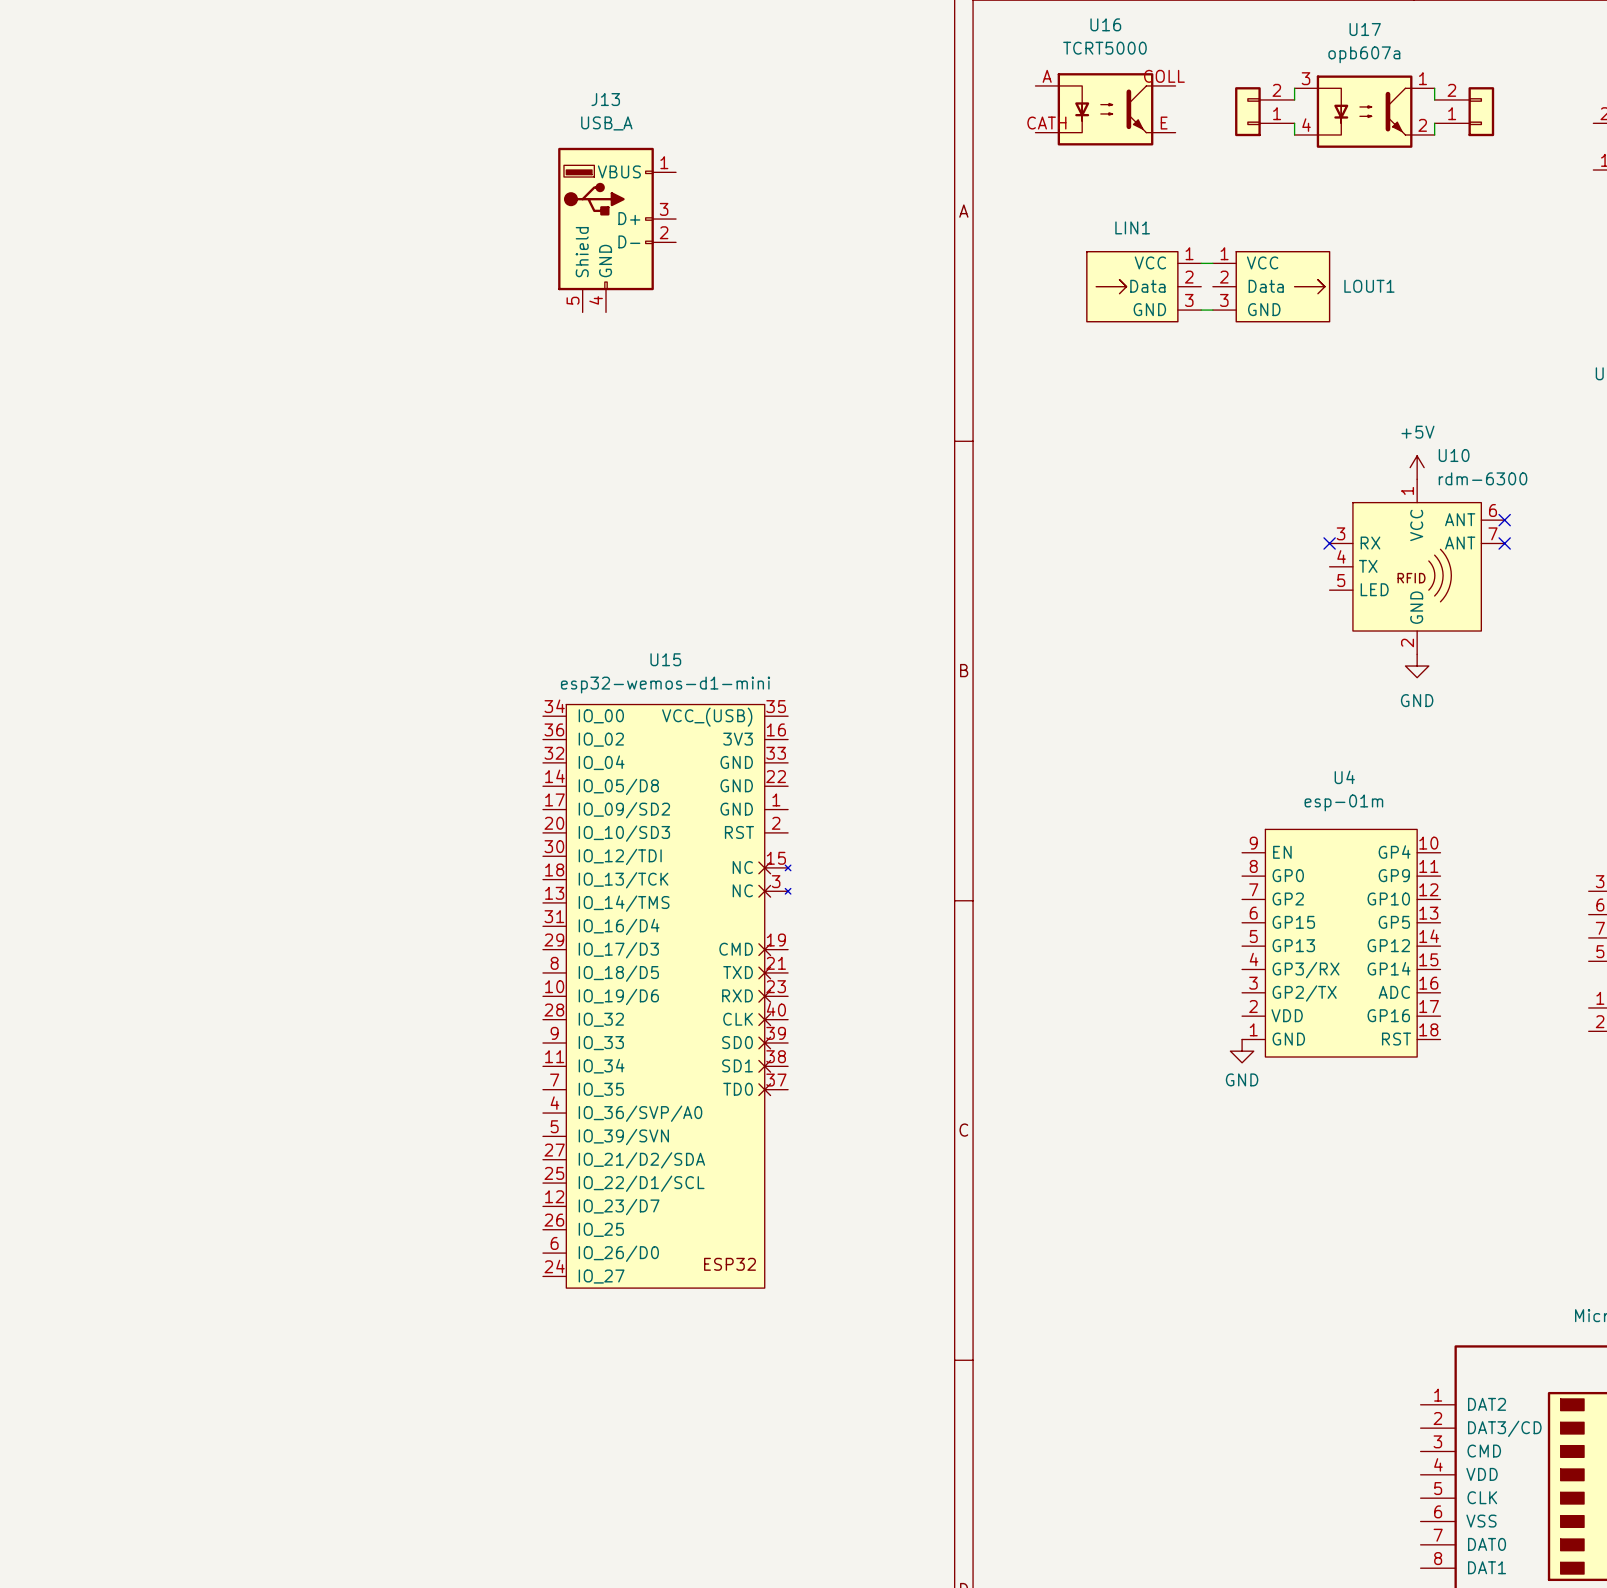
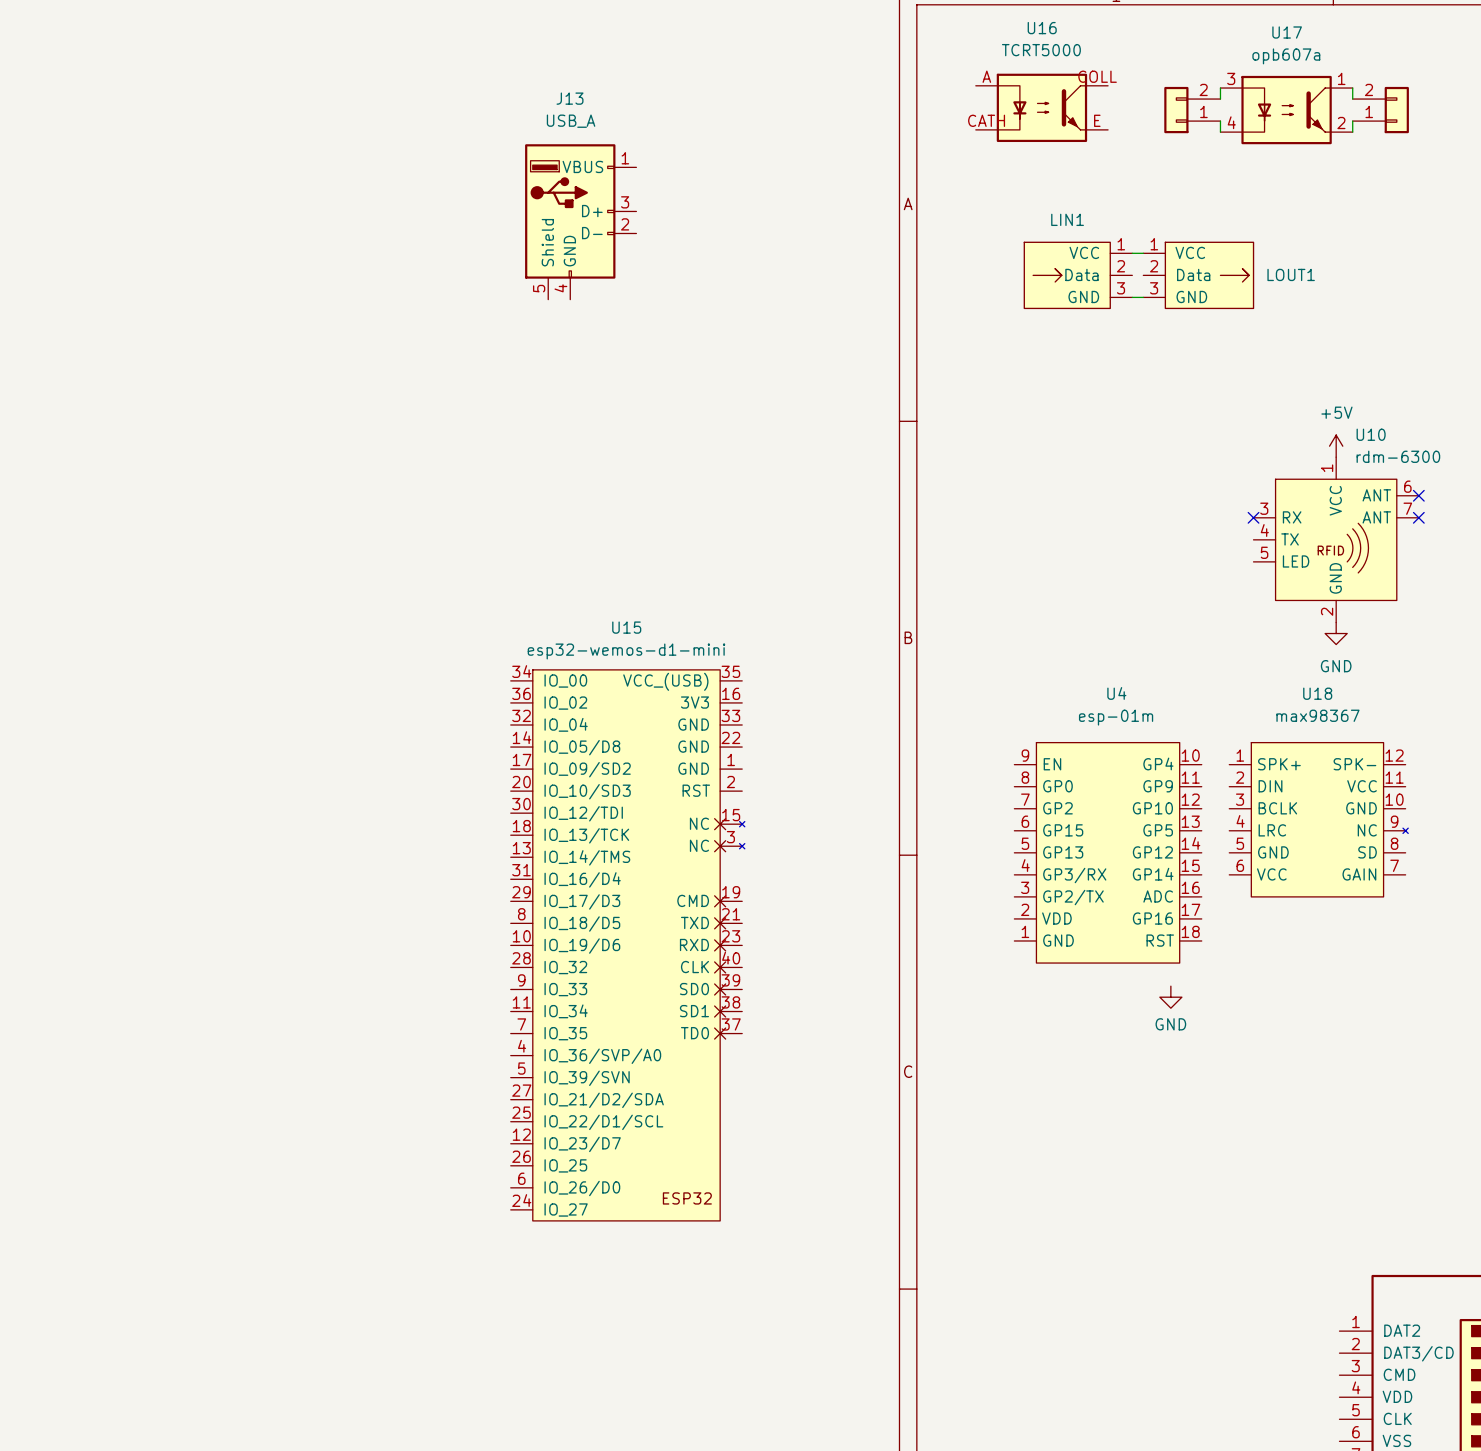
U4 symbol: [1242, 829, 1441, 1058] -> [1014, 742, 1202, 964]
U18: none -> max98367 (1318, 819)

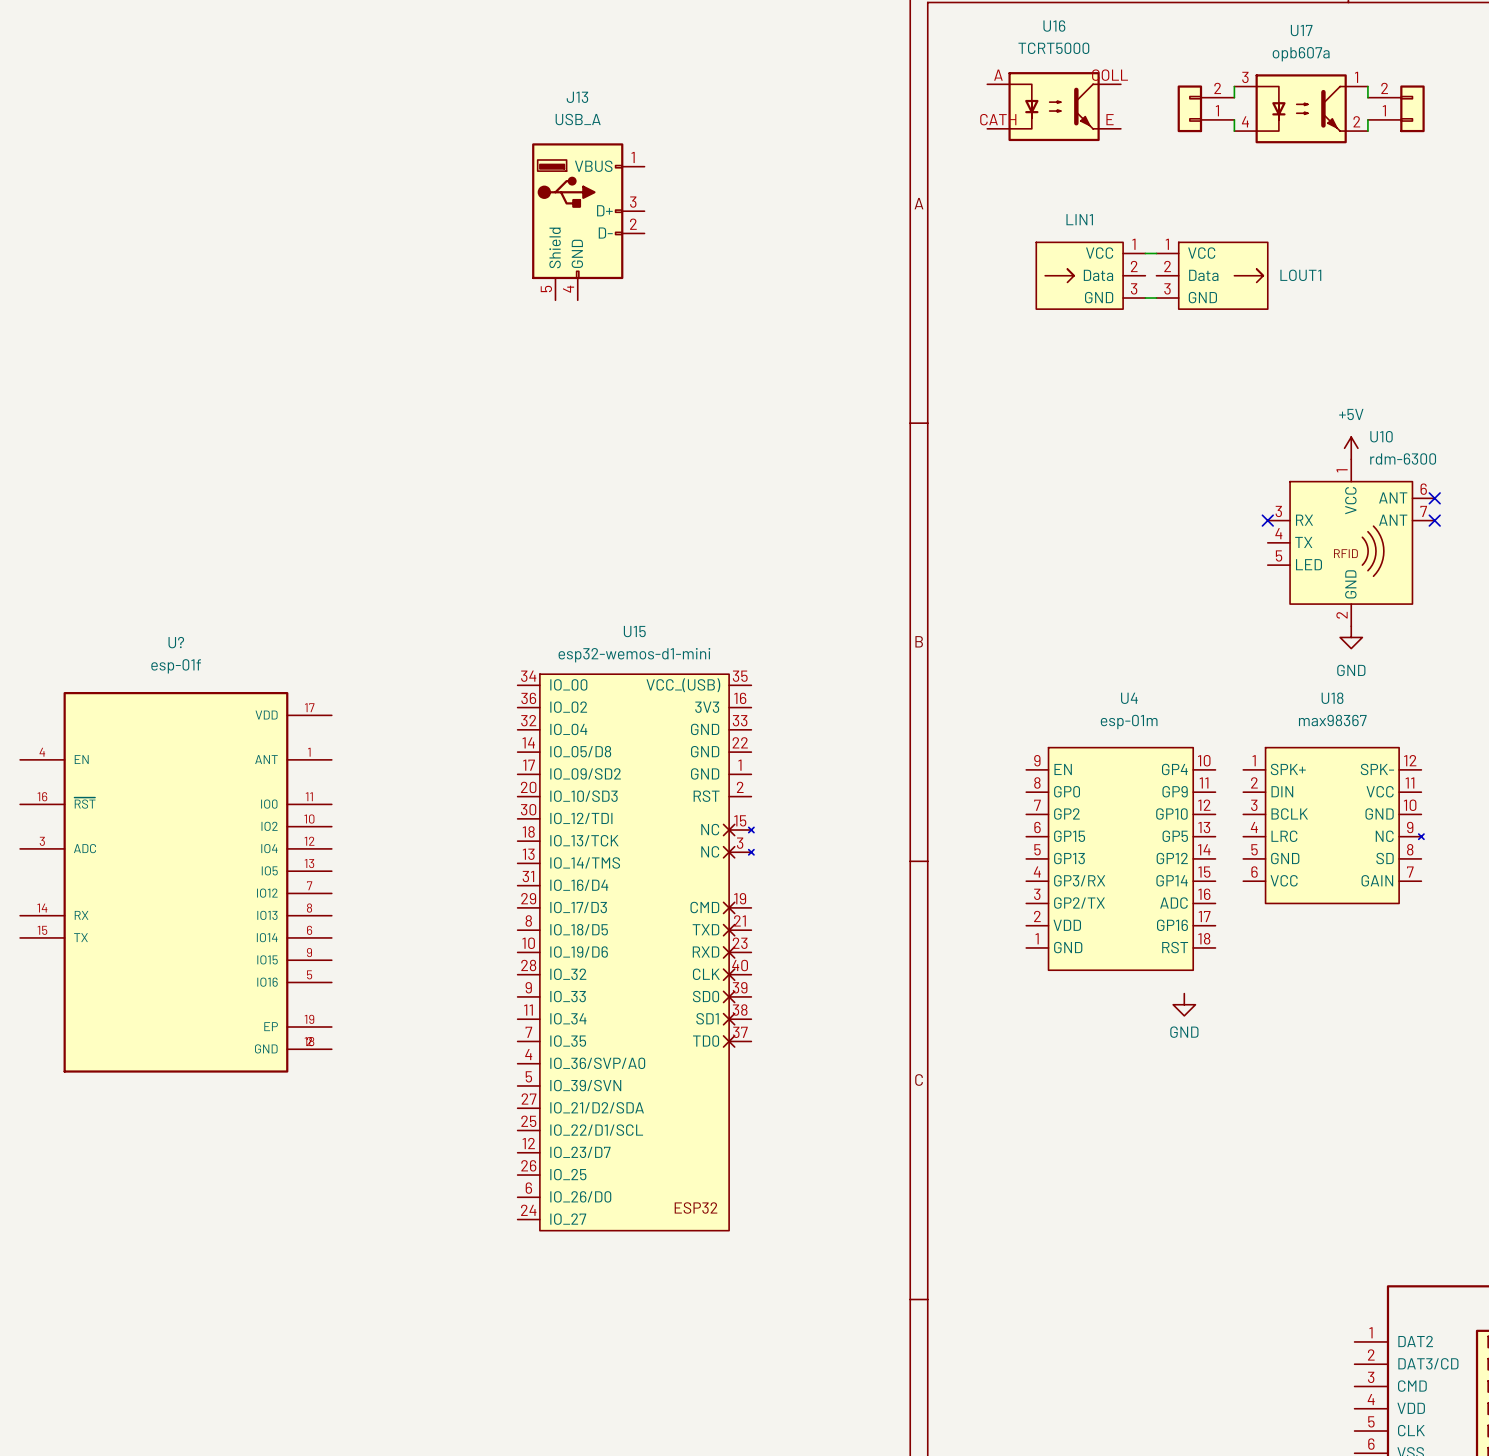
U?: none -> esp-01f (175, 882)

